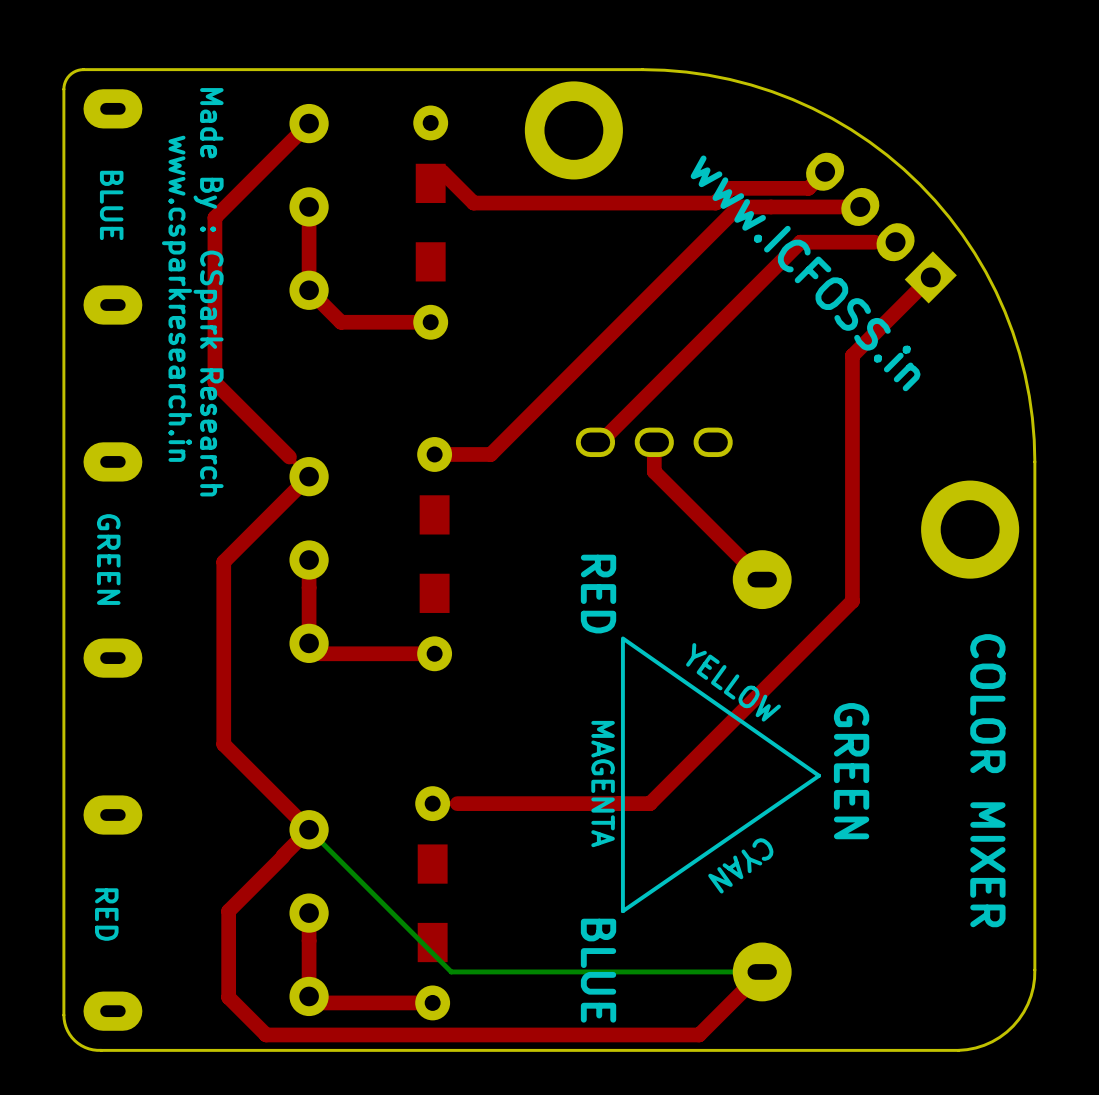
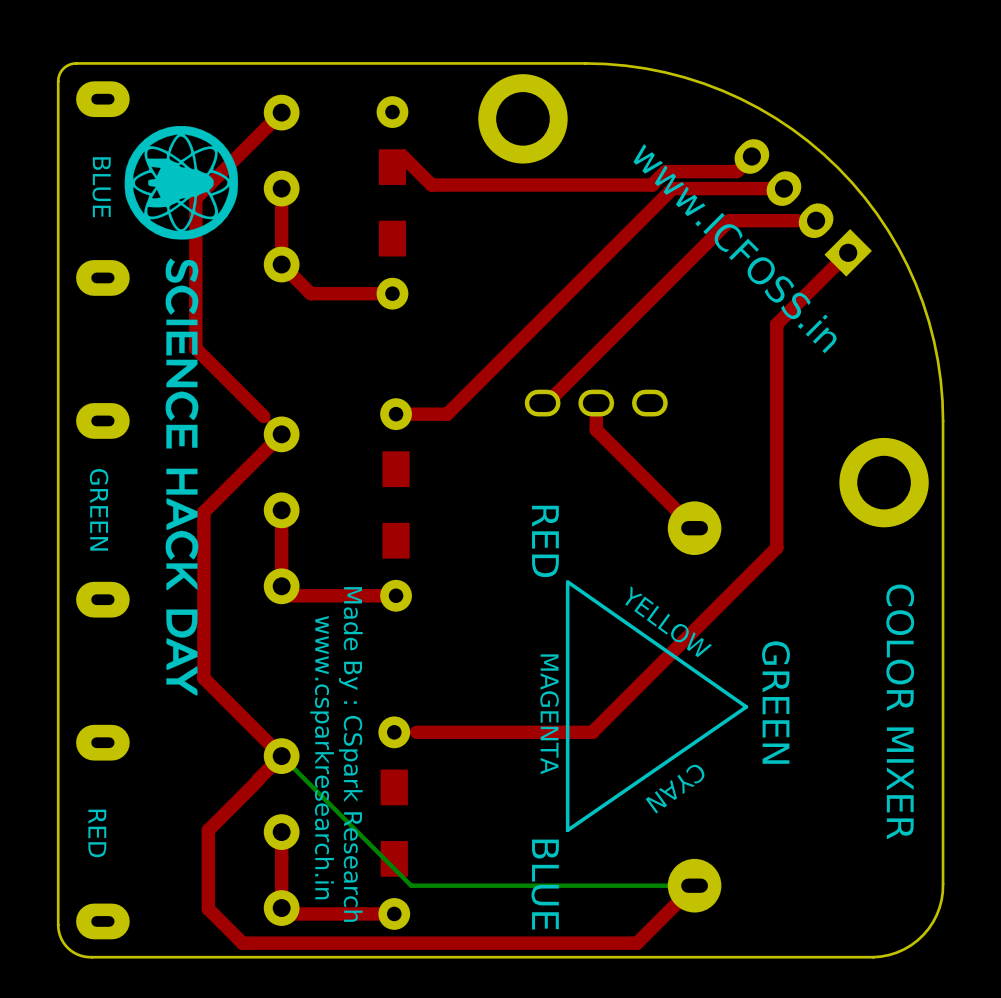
drawing: none -> [124, 125, 239, 696]
text: Made By : CSpark Research (208, 292) -> none
text: www.csparkresearch.in (176, 298) -> none
text: none -> Made By : CSpark Research (350, 754)
text: none -> www.csparkresearch.in (322, 757)

